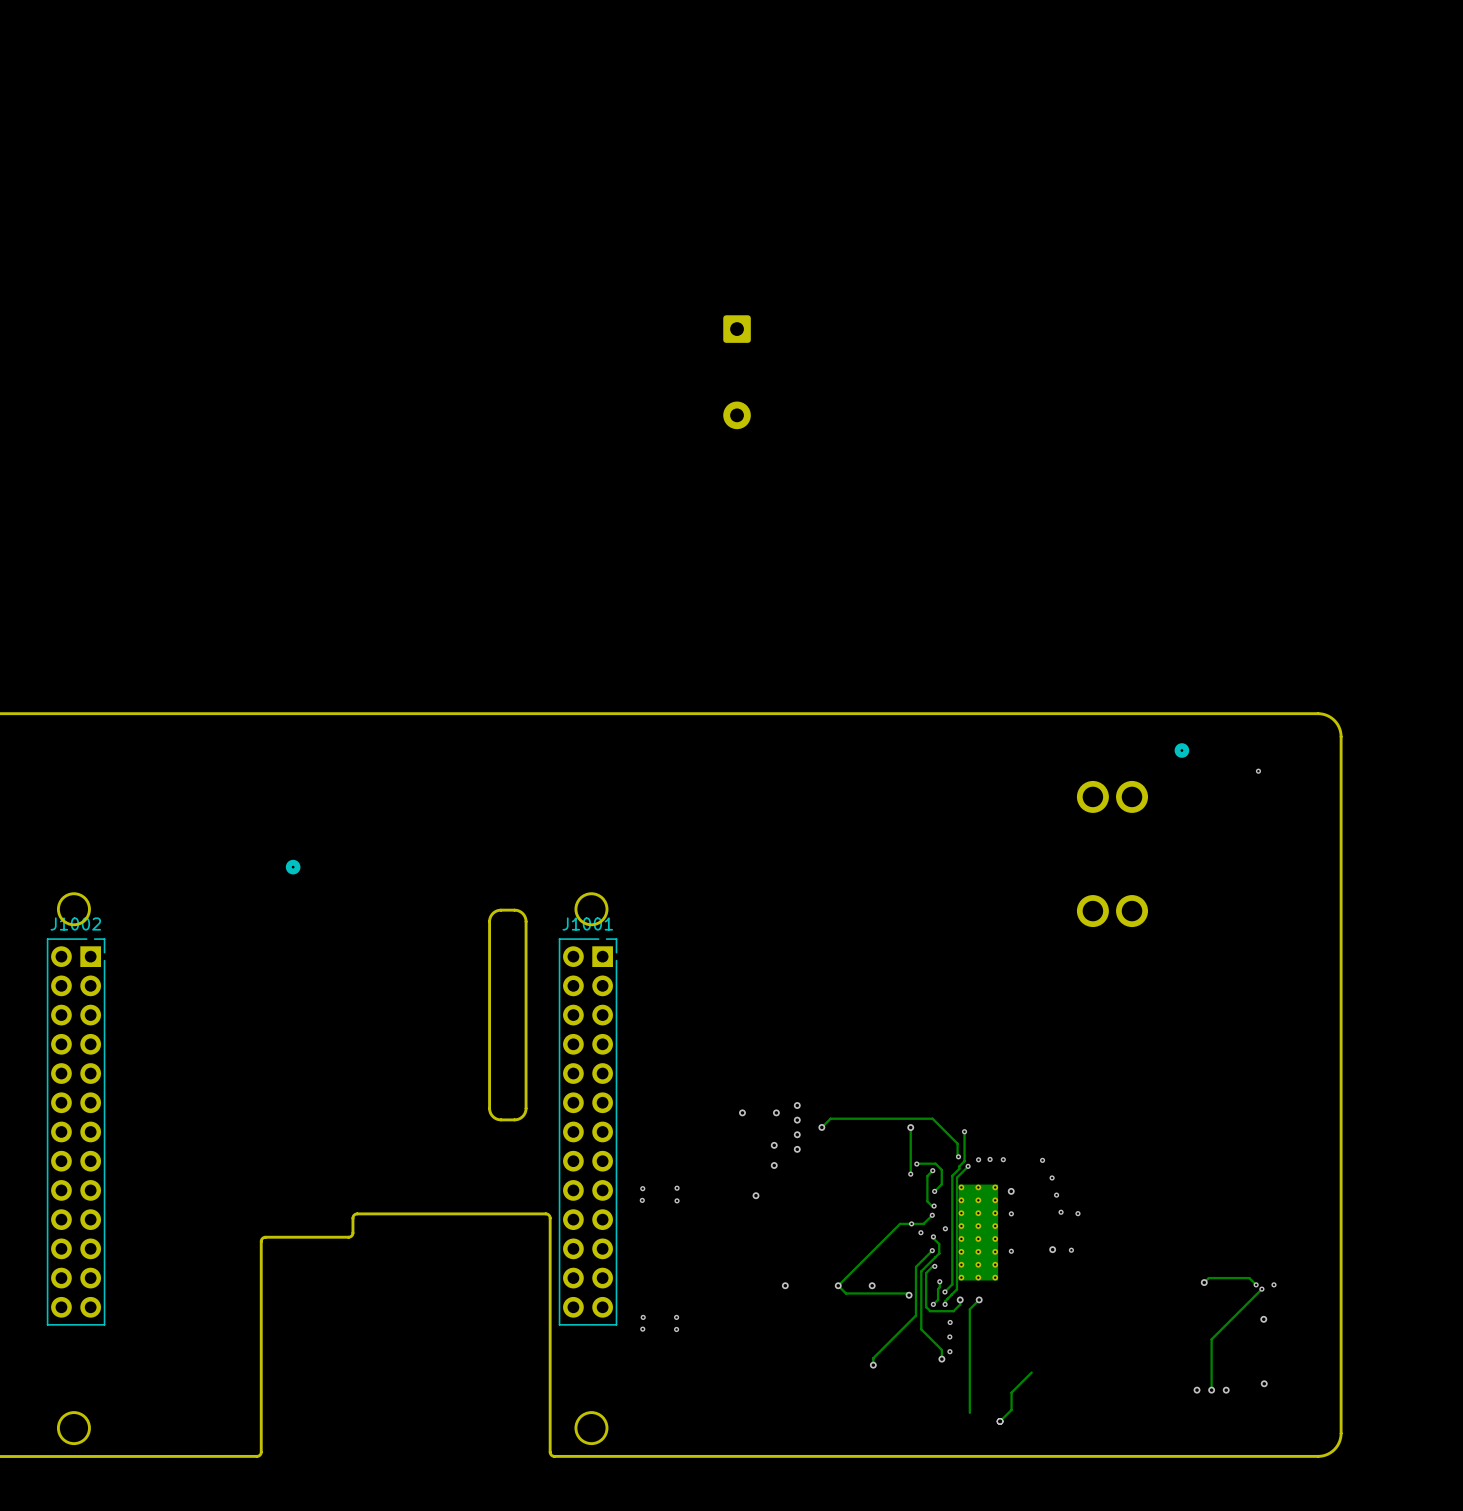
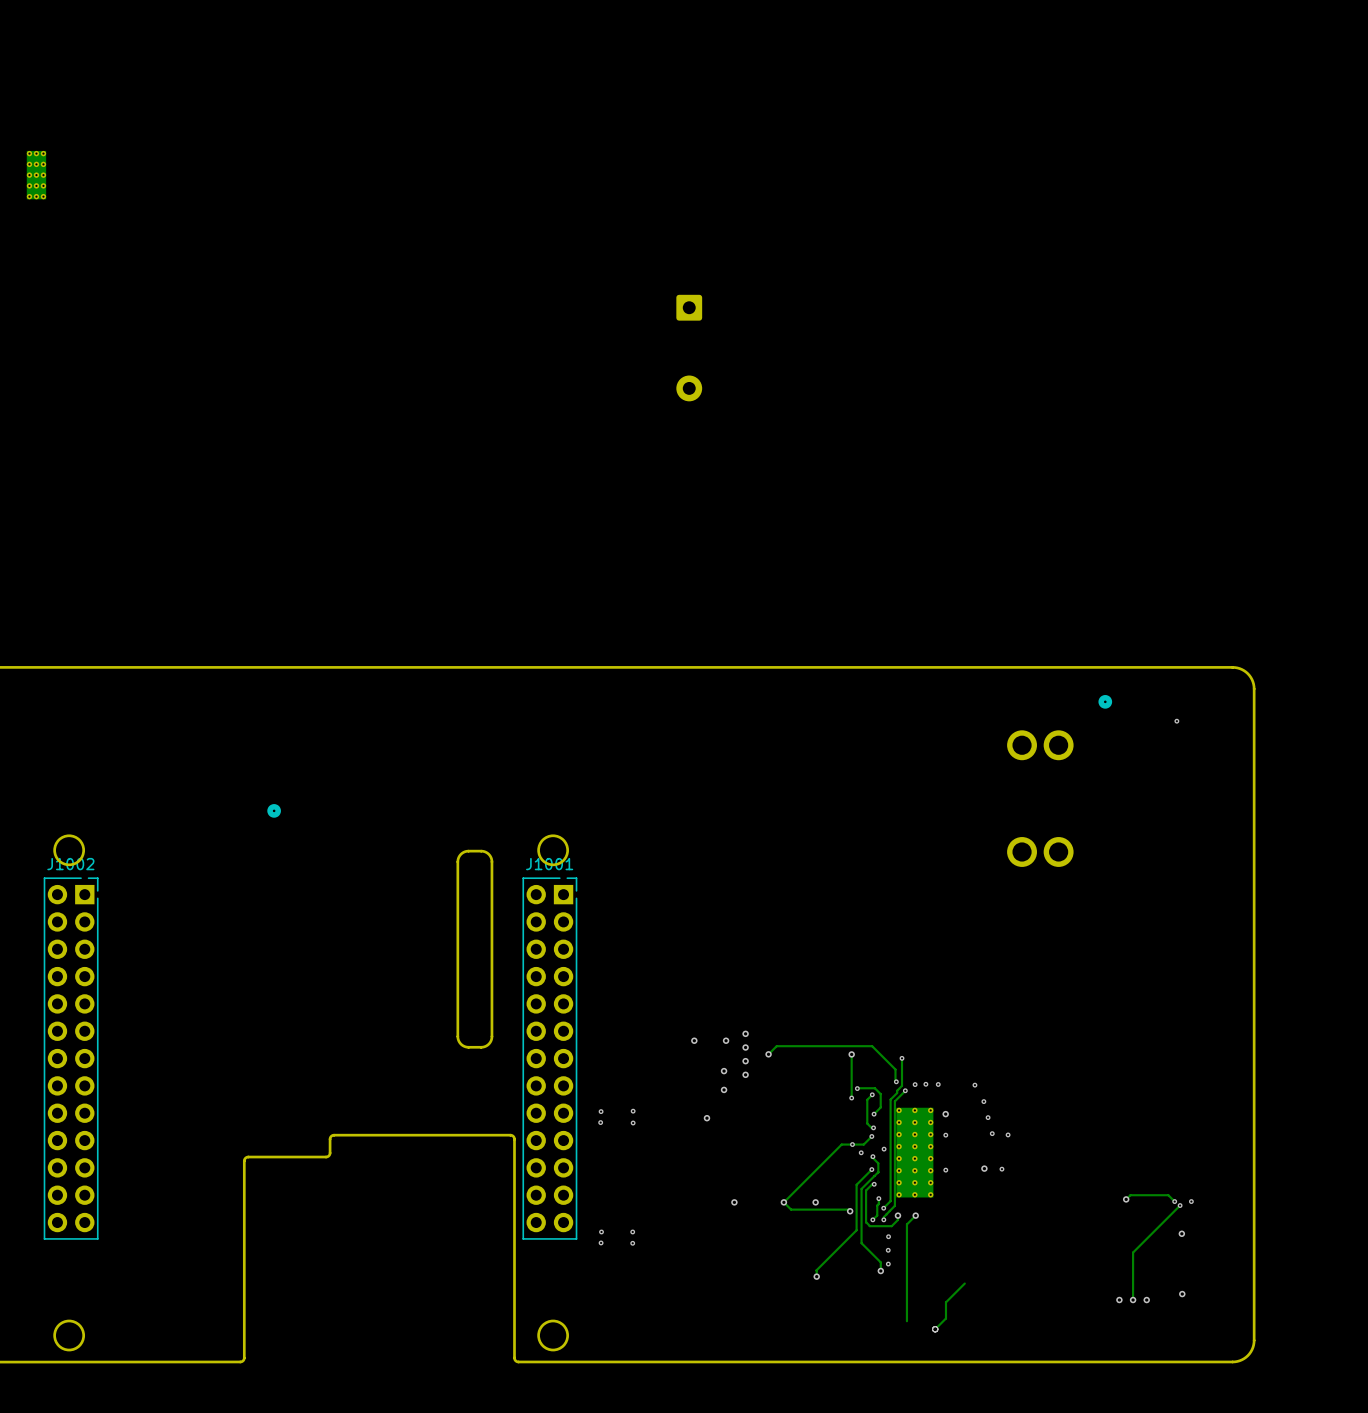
part: none -> (36, 175)

